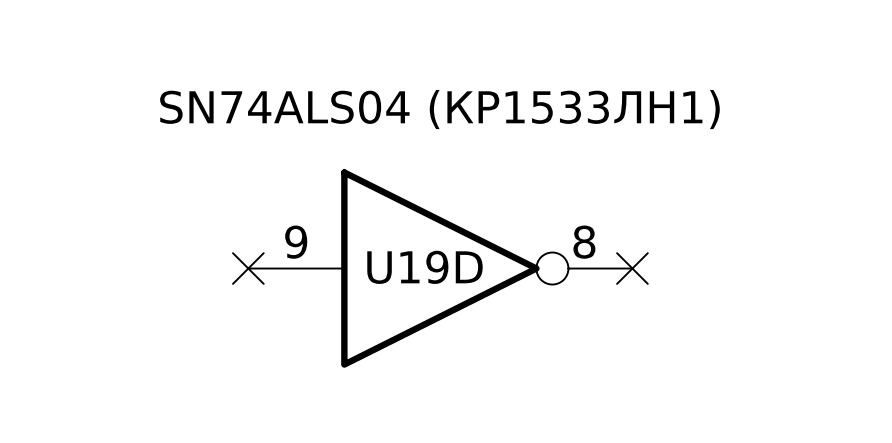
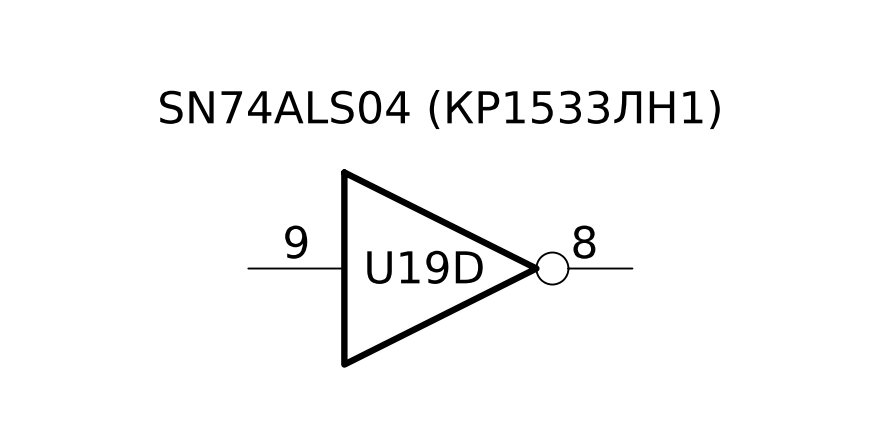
no-connect mark: (248, 268) -> none
no-connect mark: (632, 268) -> none

